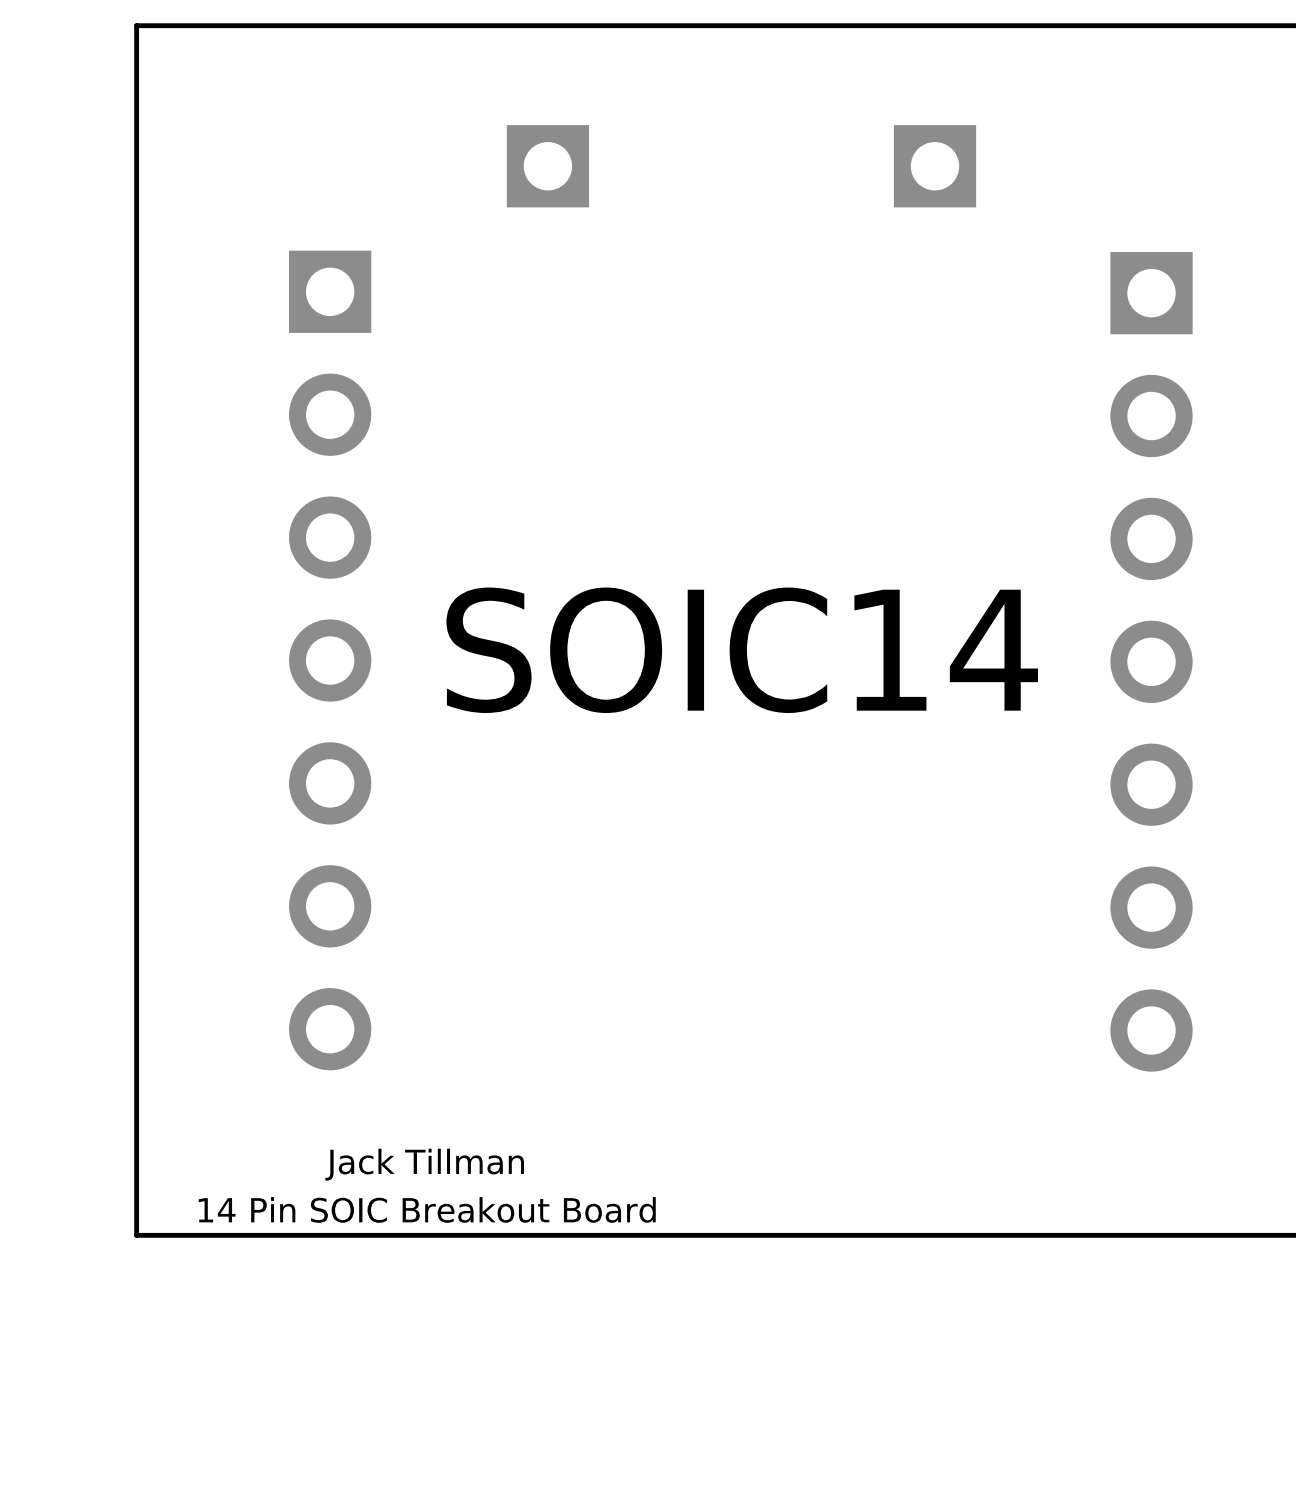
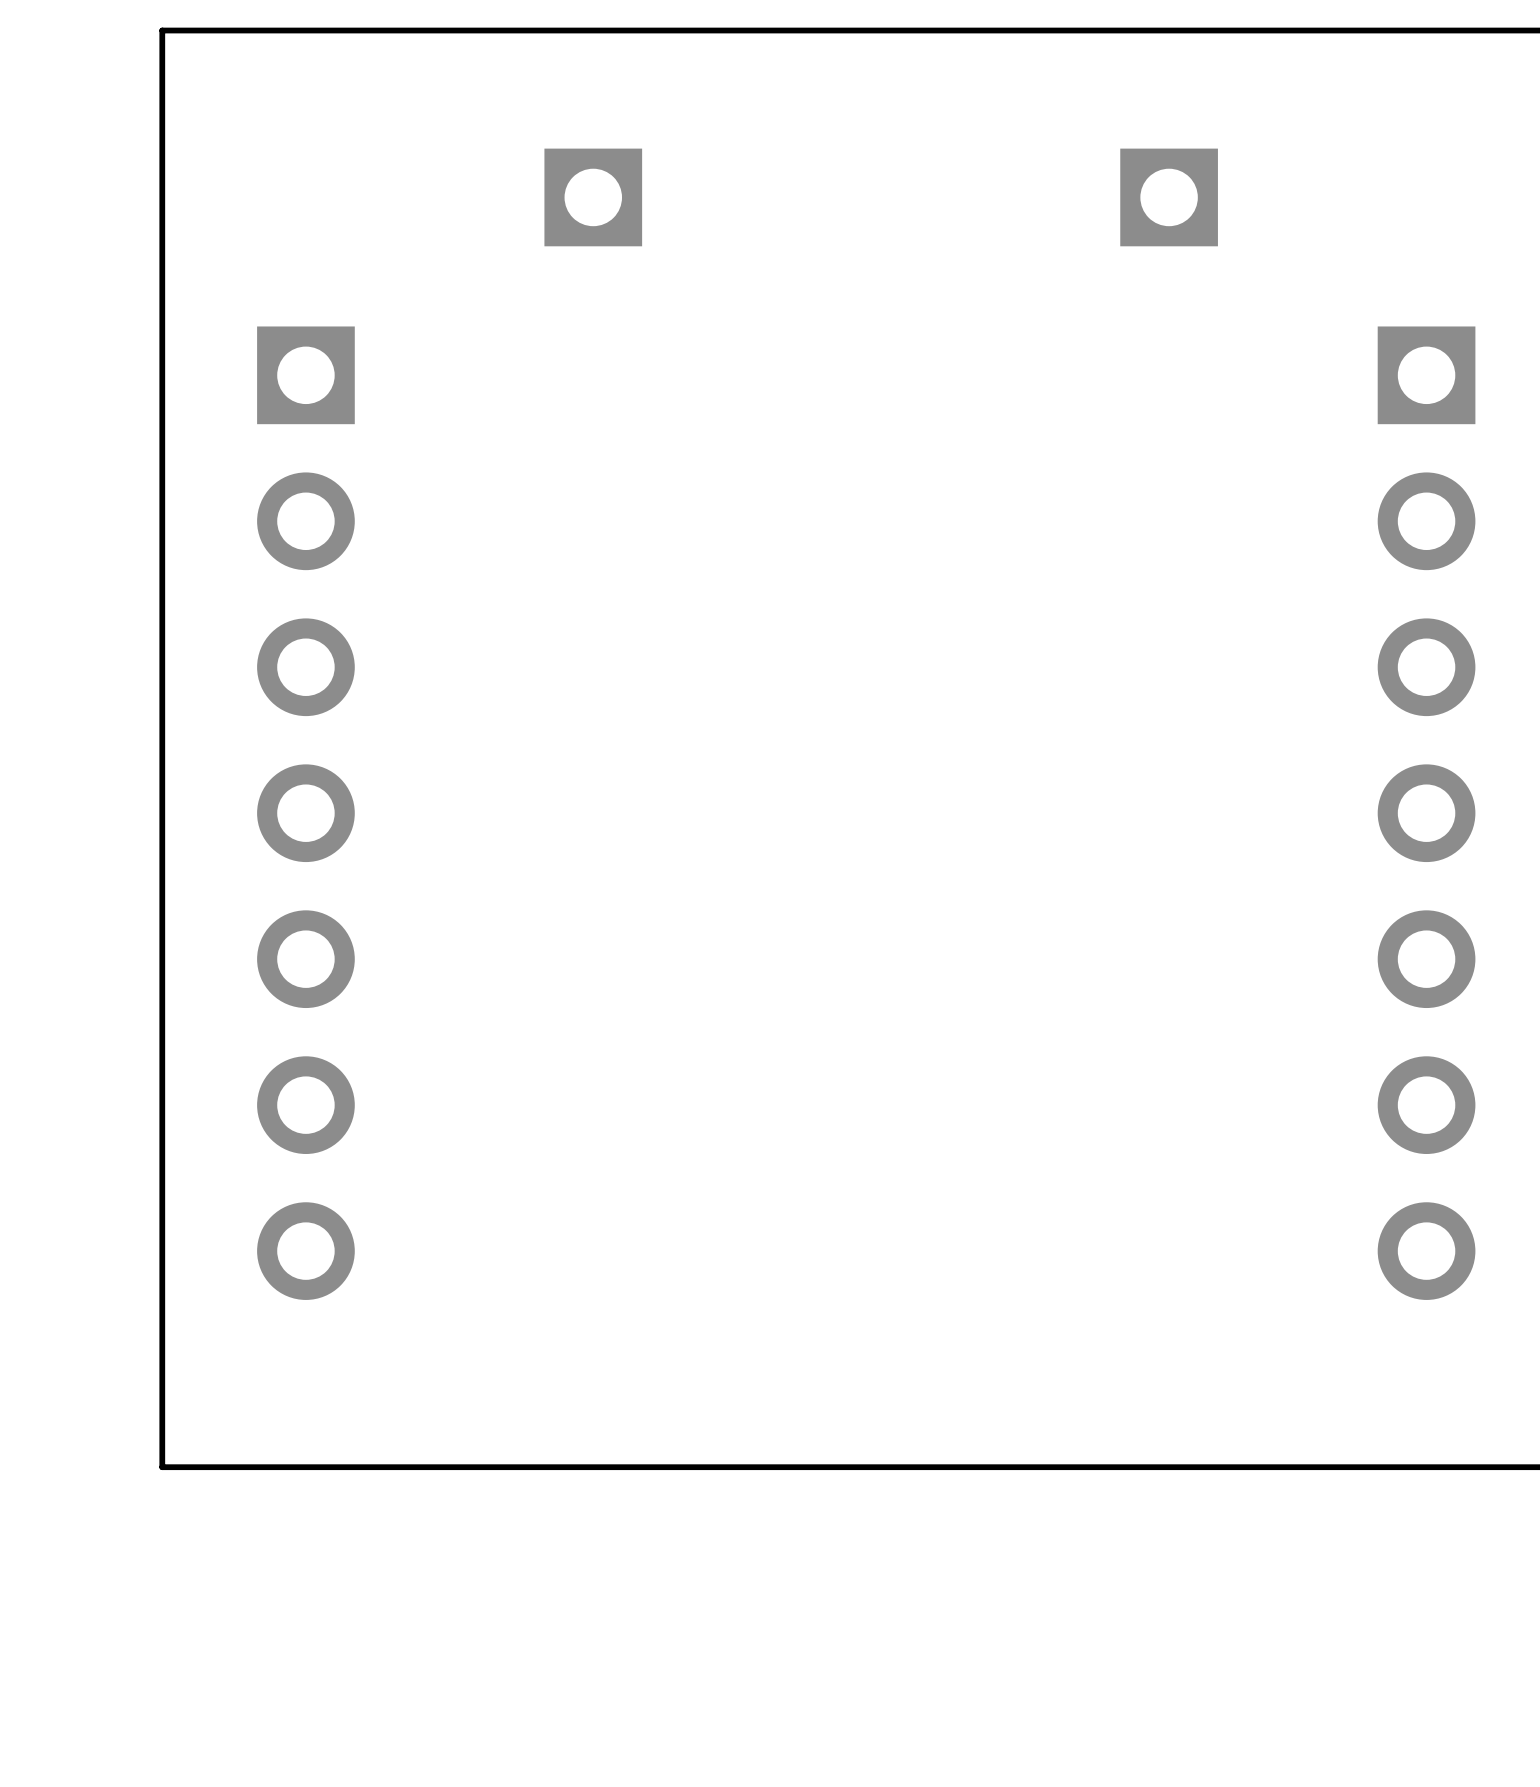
part position: (547, 166) -> (593, 197)
part position: (935, 166) -> (1169, 197)
SOIC14: (742, 650) -> none
part position: (330, 660) -> (305, 813)
part position: (1151, 661) -> (1426, 813)
text: Jack Tillman (424, 1164) -> none
text: 14 Pin SOIC Breakout Board (427, 1209) -> none

